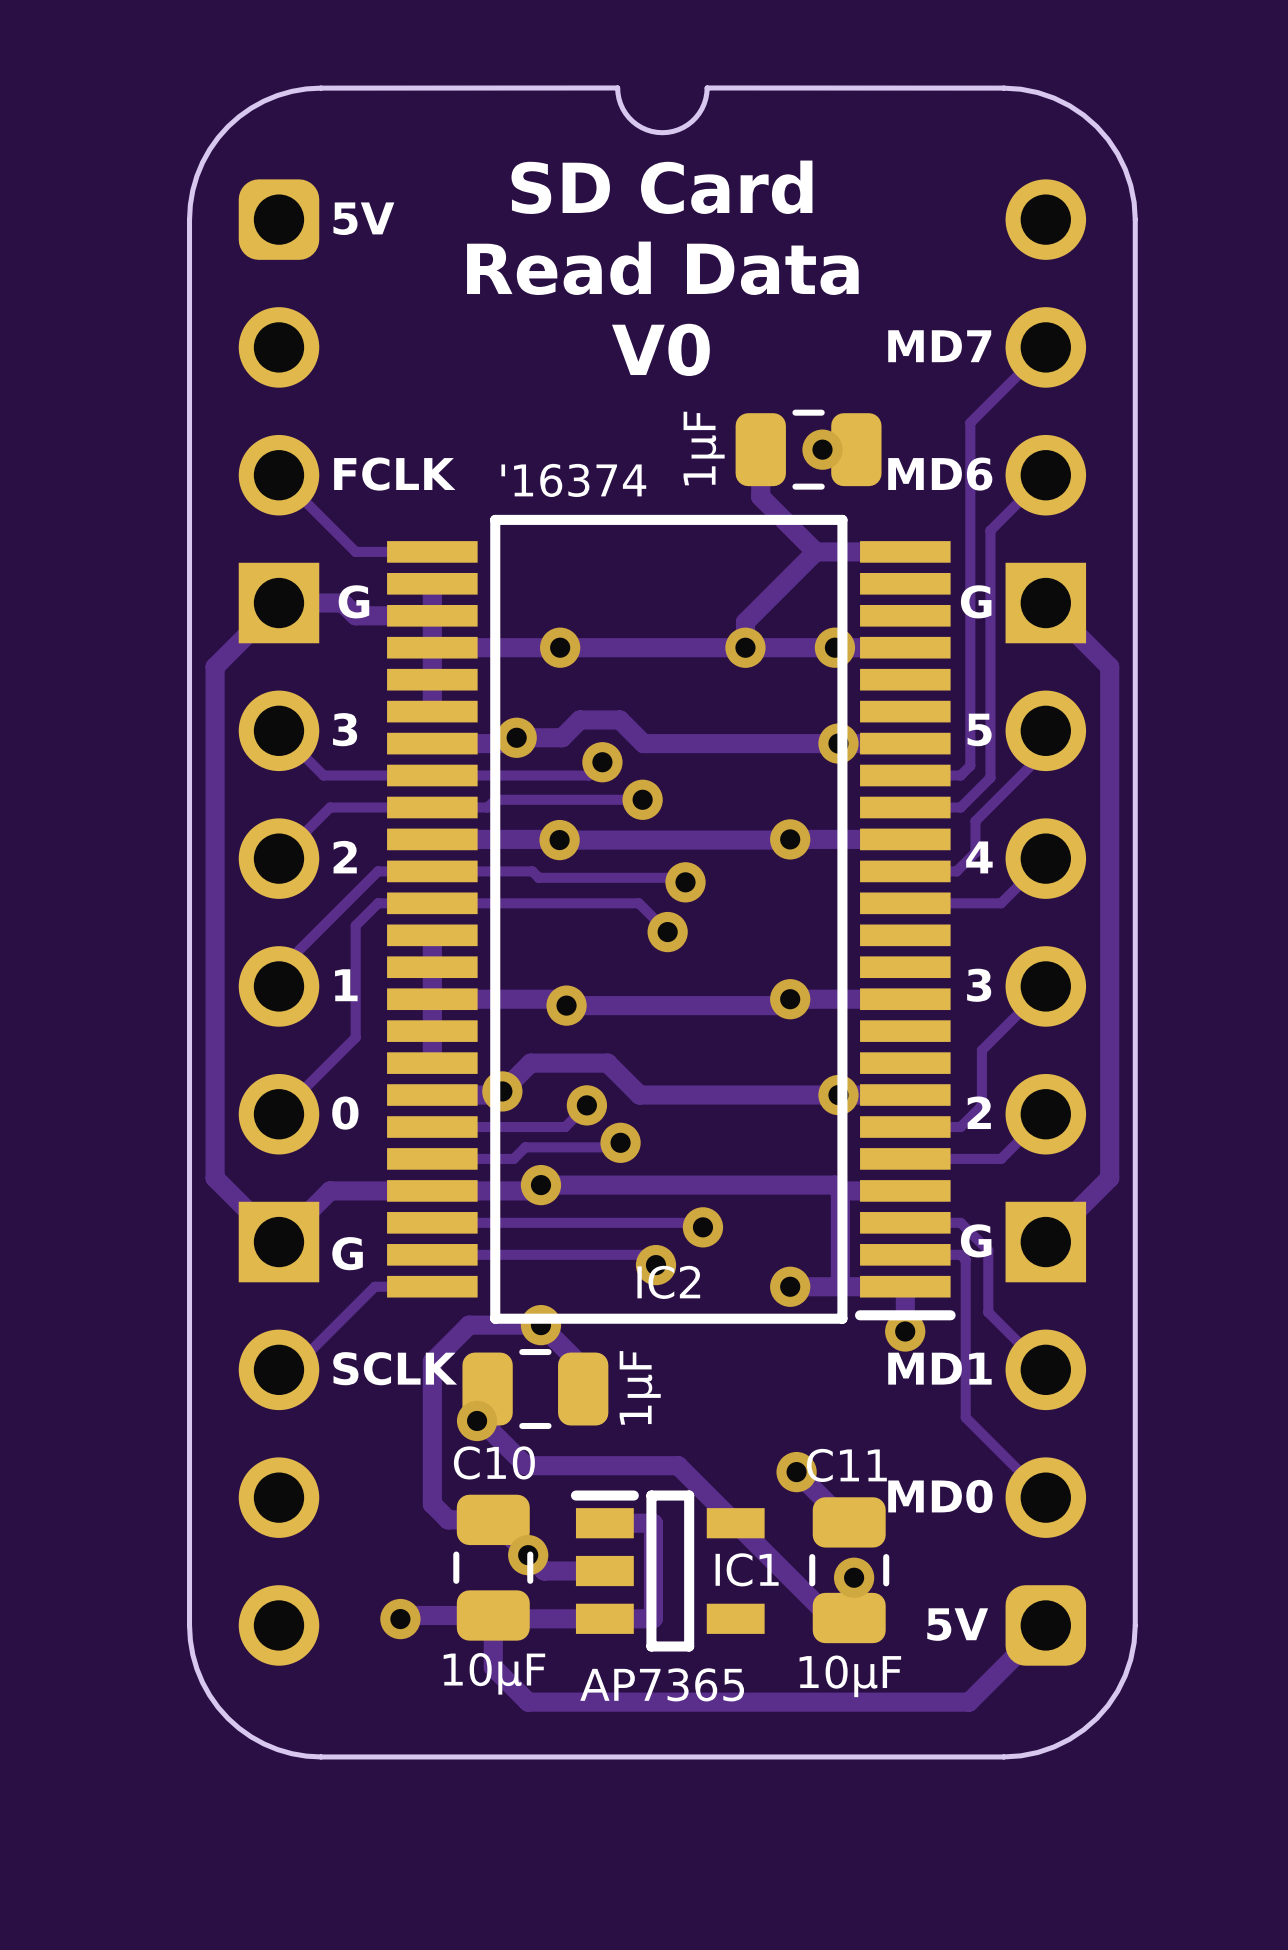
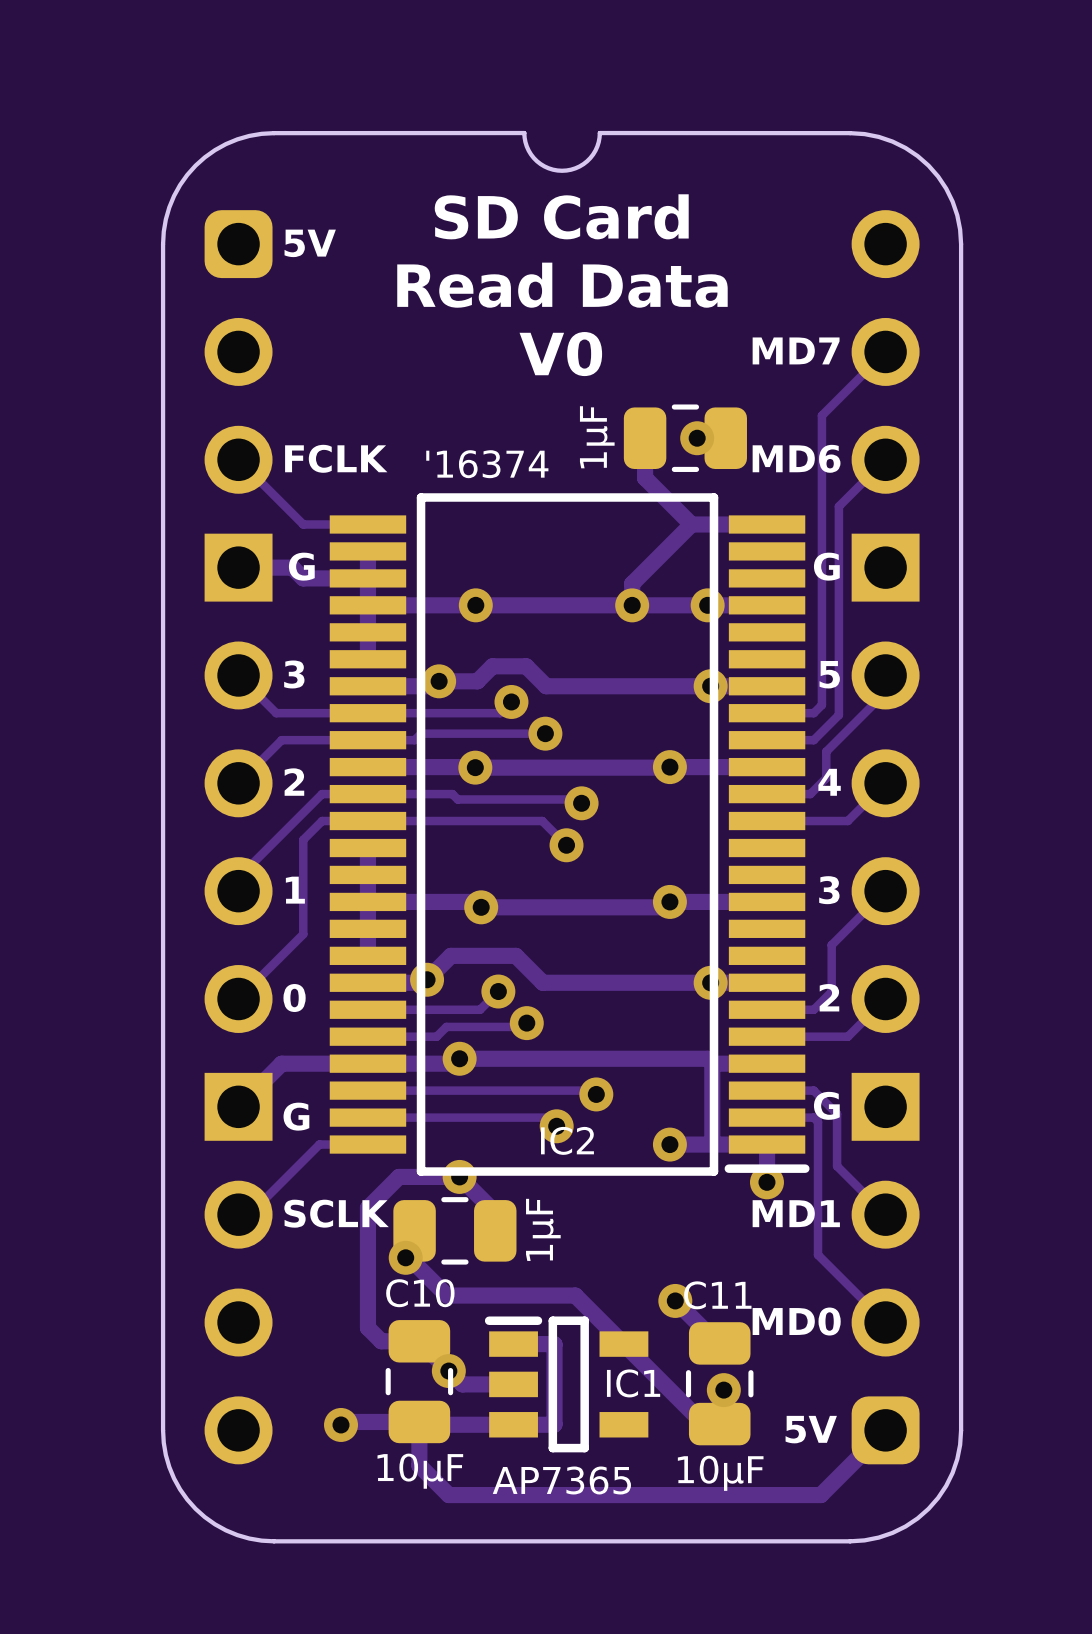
track: (278, 603) (215, 666) (215, 1178) (278, 1242) -> none
track: (1045, 603) (1109, 666) (1109, 1178) (1045, 1242) -> none

